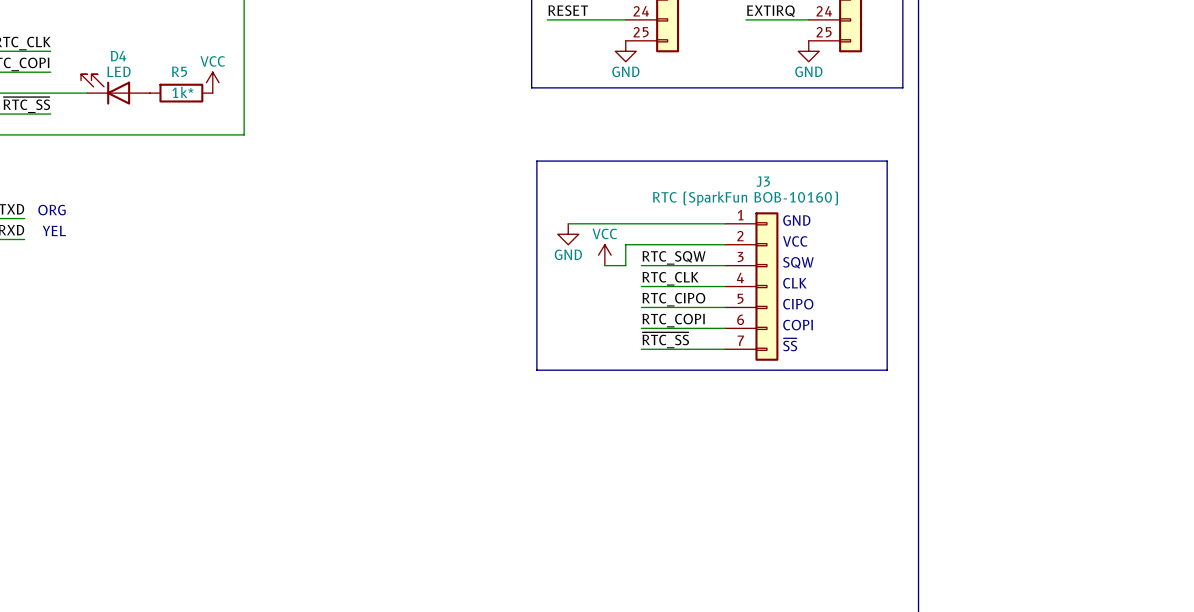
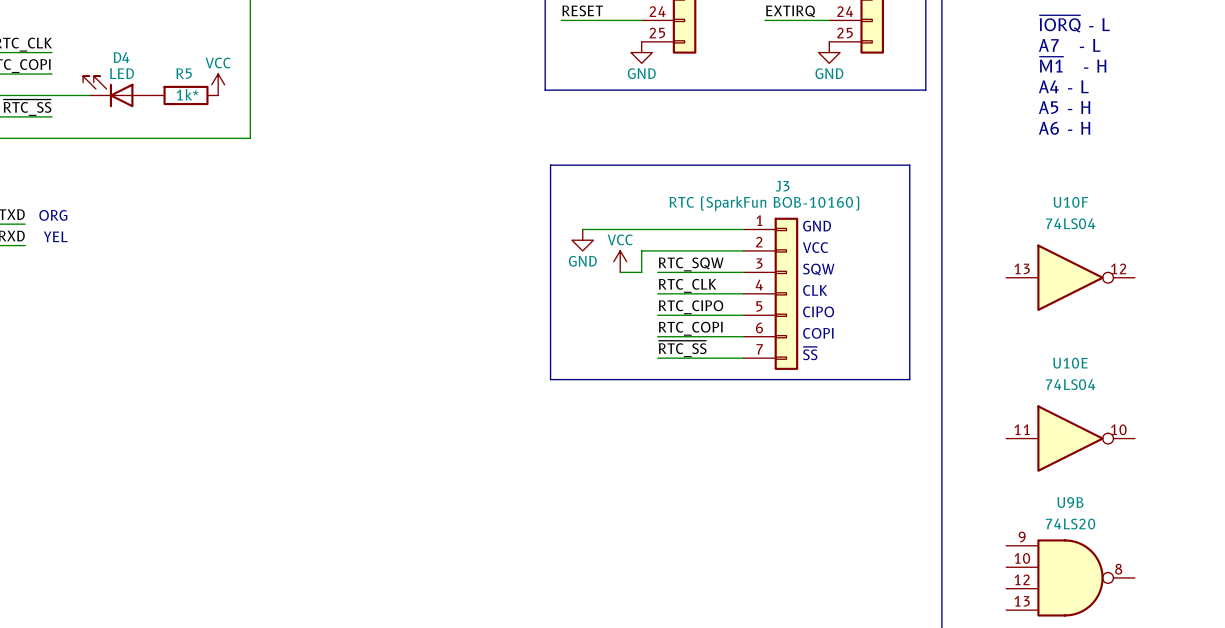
text: none -> ~{IORQ} - L (1074, 23)
text: none -> A7 - L (1069, 45)
text: none -> ~{M1} - H (1072, 64)
text: none -> A4 - L (1063, 86)
text: none -> A5 - H (1064, 107)
text: none -> A6 - H (1064, 128)
U10F: none -> 74LS04 (1070, 277)
U10E: none -> 74LS04 (1070, 438)
U9B: none -> 74LS20 (1070, 577)

